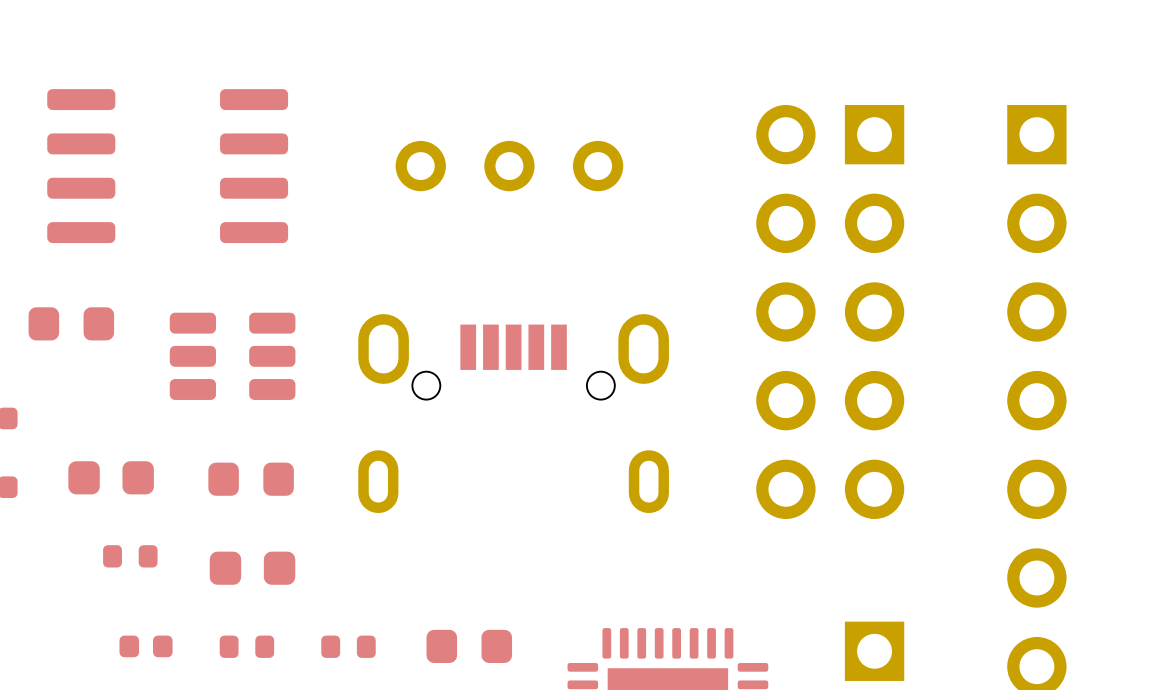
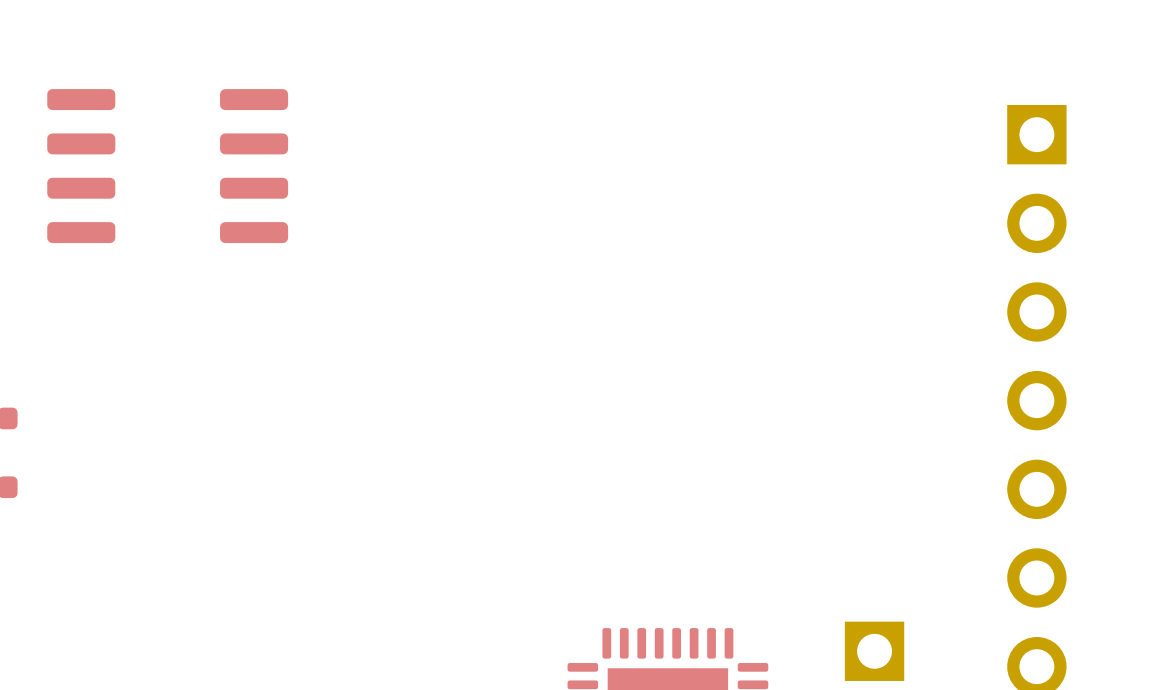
part: (509, 166) -> none
part: (830, 311) -> none
part: (71, 323) -> none
part: (232, 356) -> none
part: (513, 413) -> none
part: (111, 477) -> none
part: (251, 479) -> none
part: (130, 556) -> none
part: (252, 568) -> none
part: (146, 646) -> none
part: (246, 646) -> none
part: (348, 646) -> none
part: (469, 646) -> none

